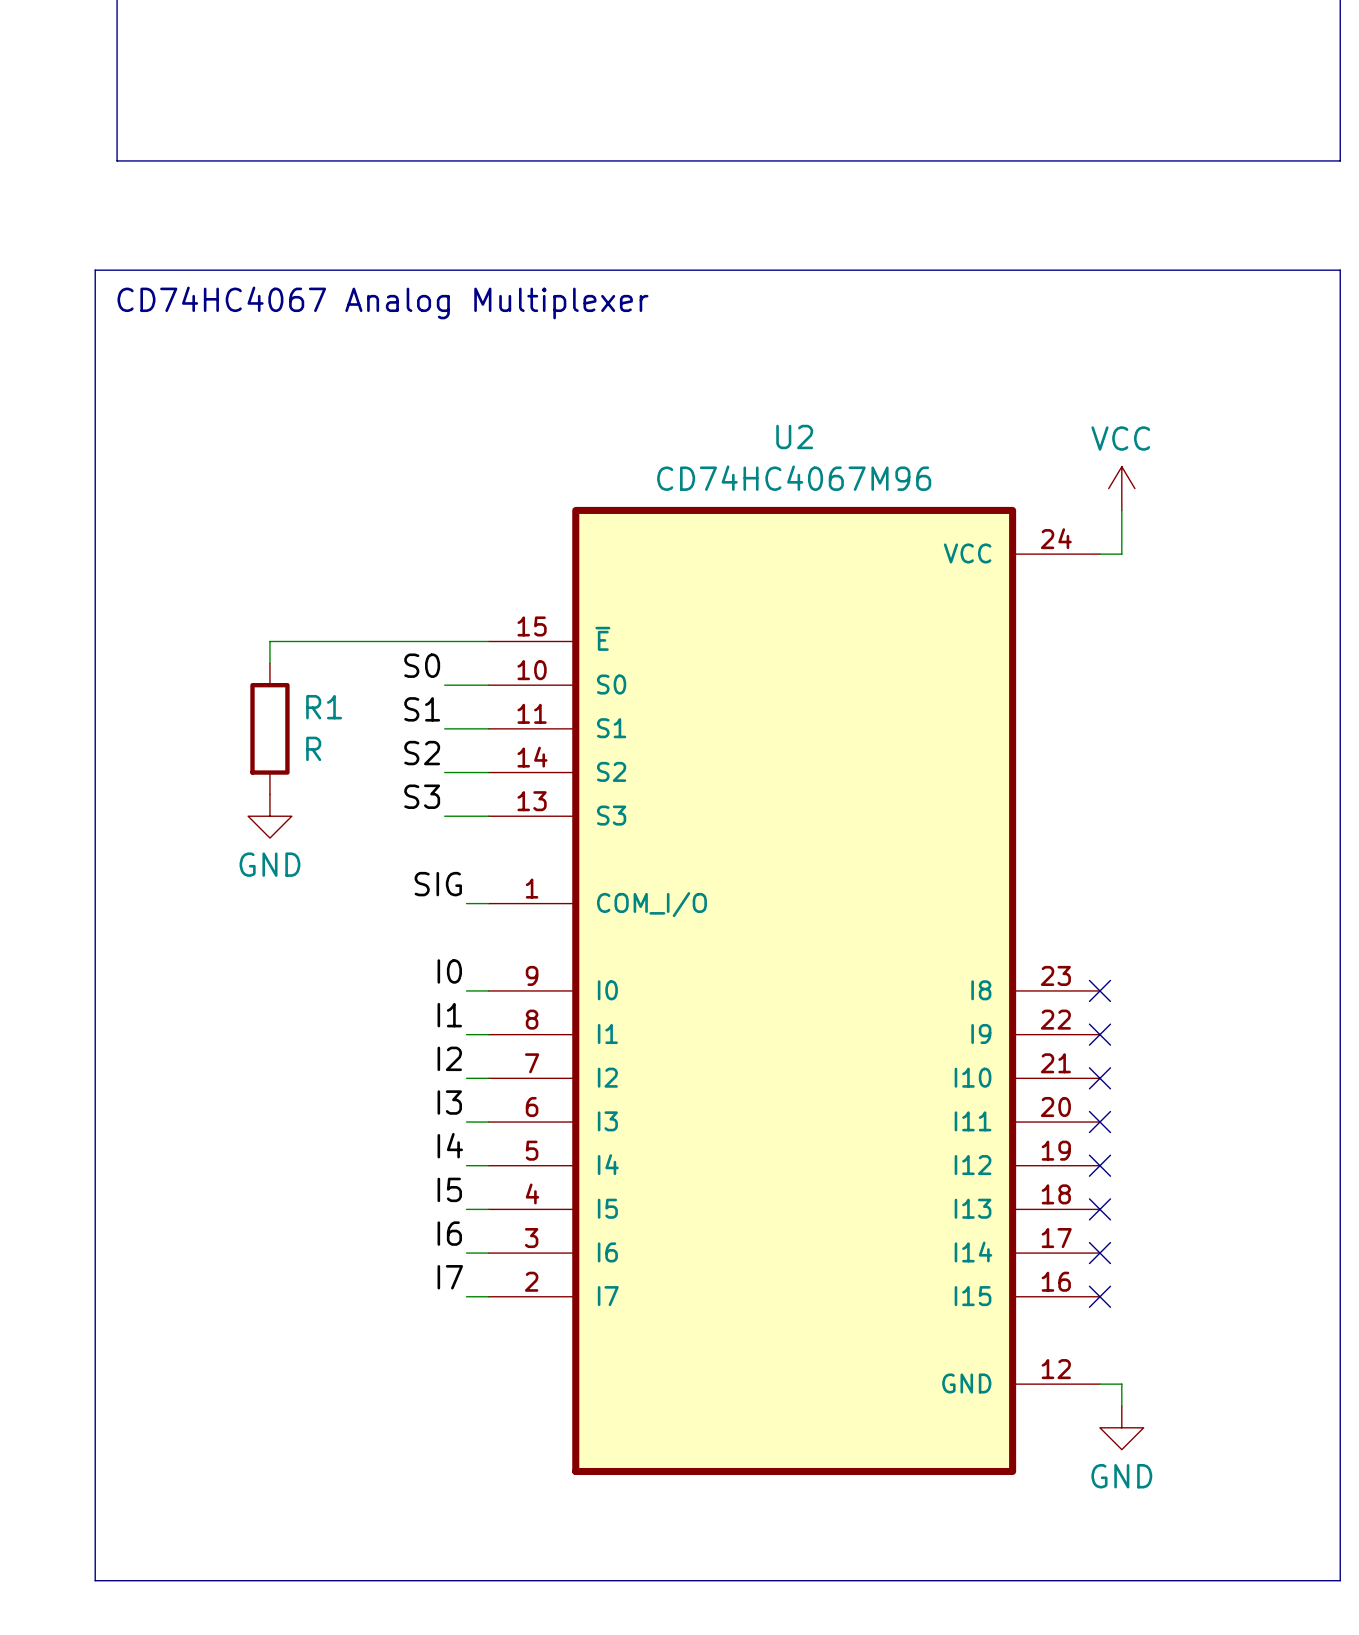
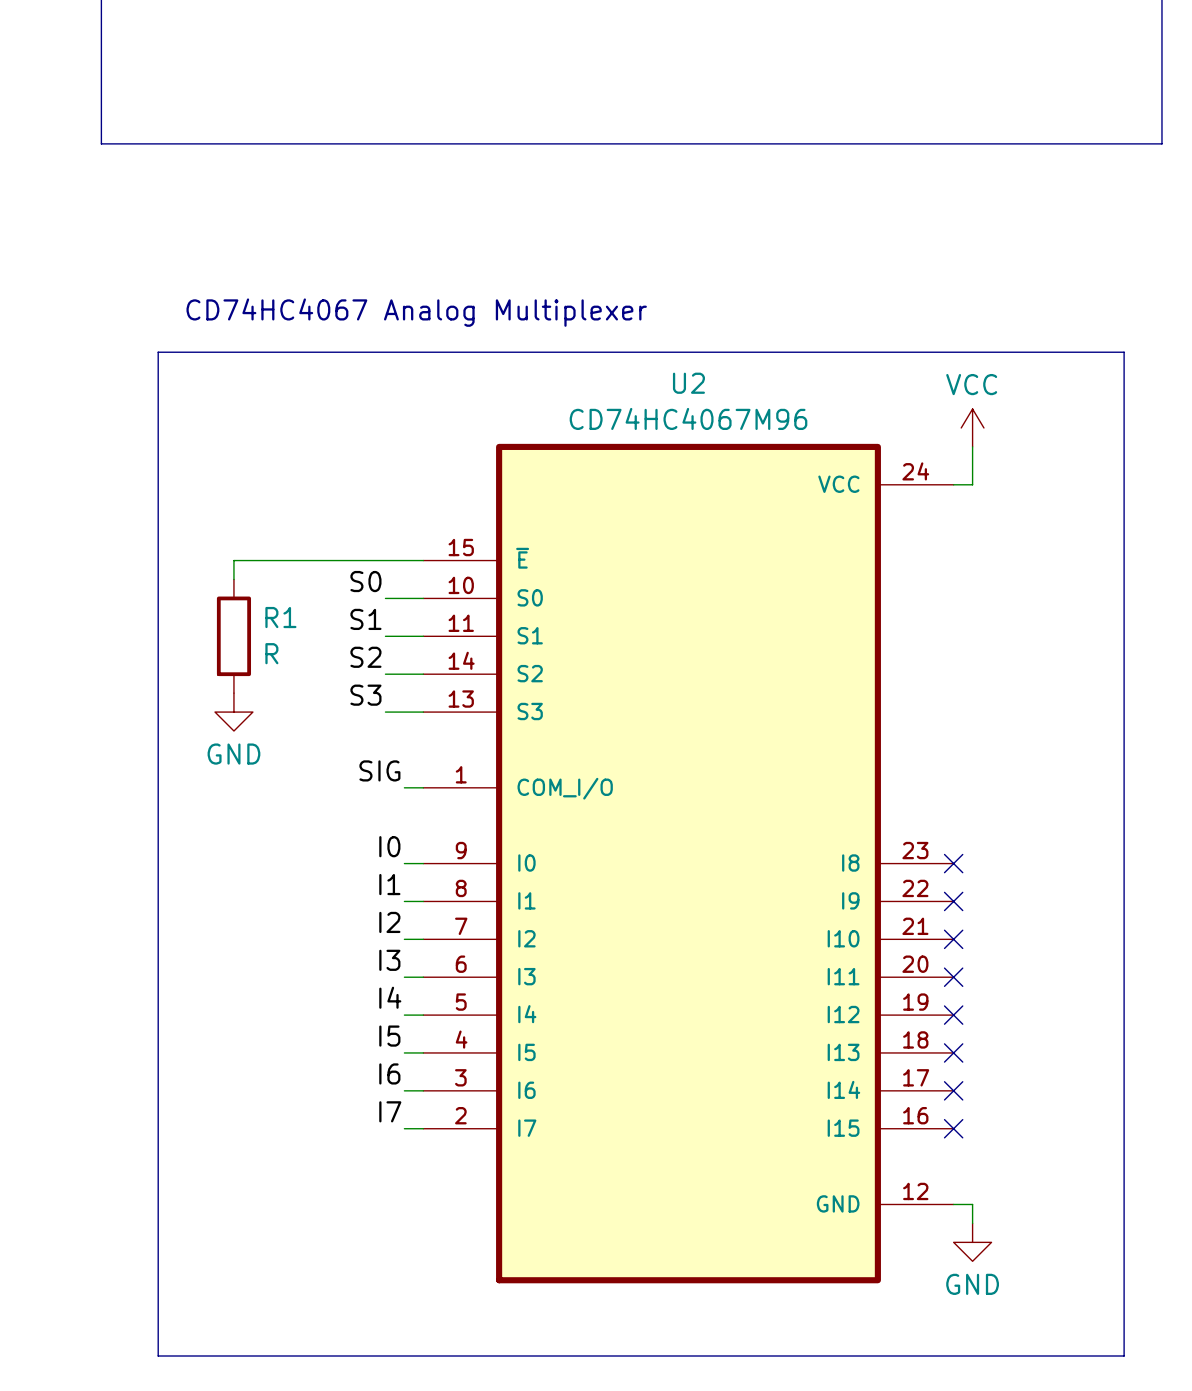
line: (95, 270) (1340, 270) (1340, 1580) (95, 1580) (95, 270) -> (158, 352) (158, 1356) (1124, 1356) (1124, 352) (158, 352)
text position: CD74HC4067 Analog Multiplexer (382, 302) -> CD74HC4067 Analog Multiplexer (416, 312)

